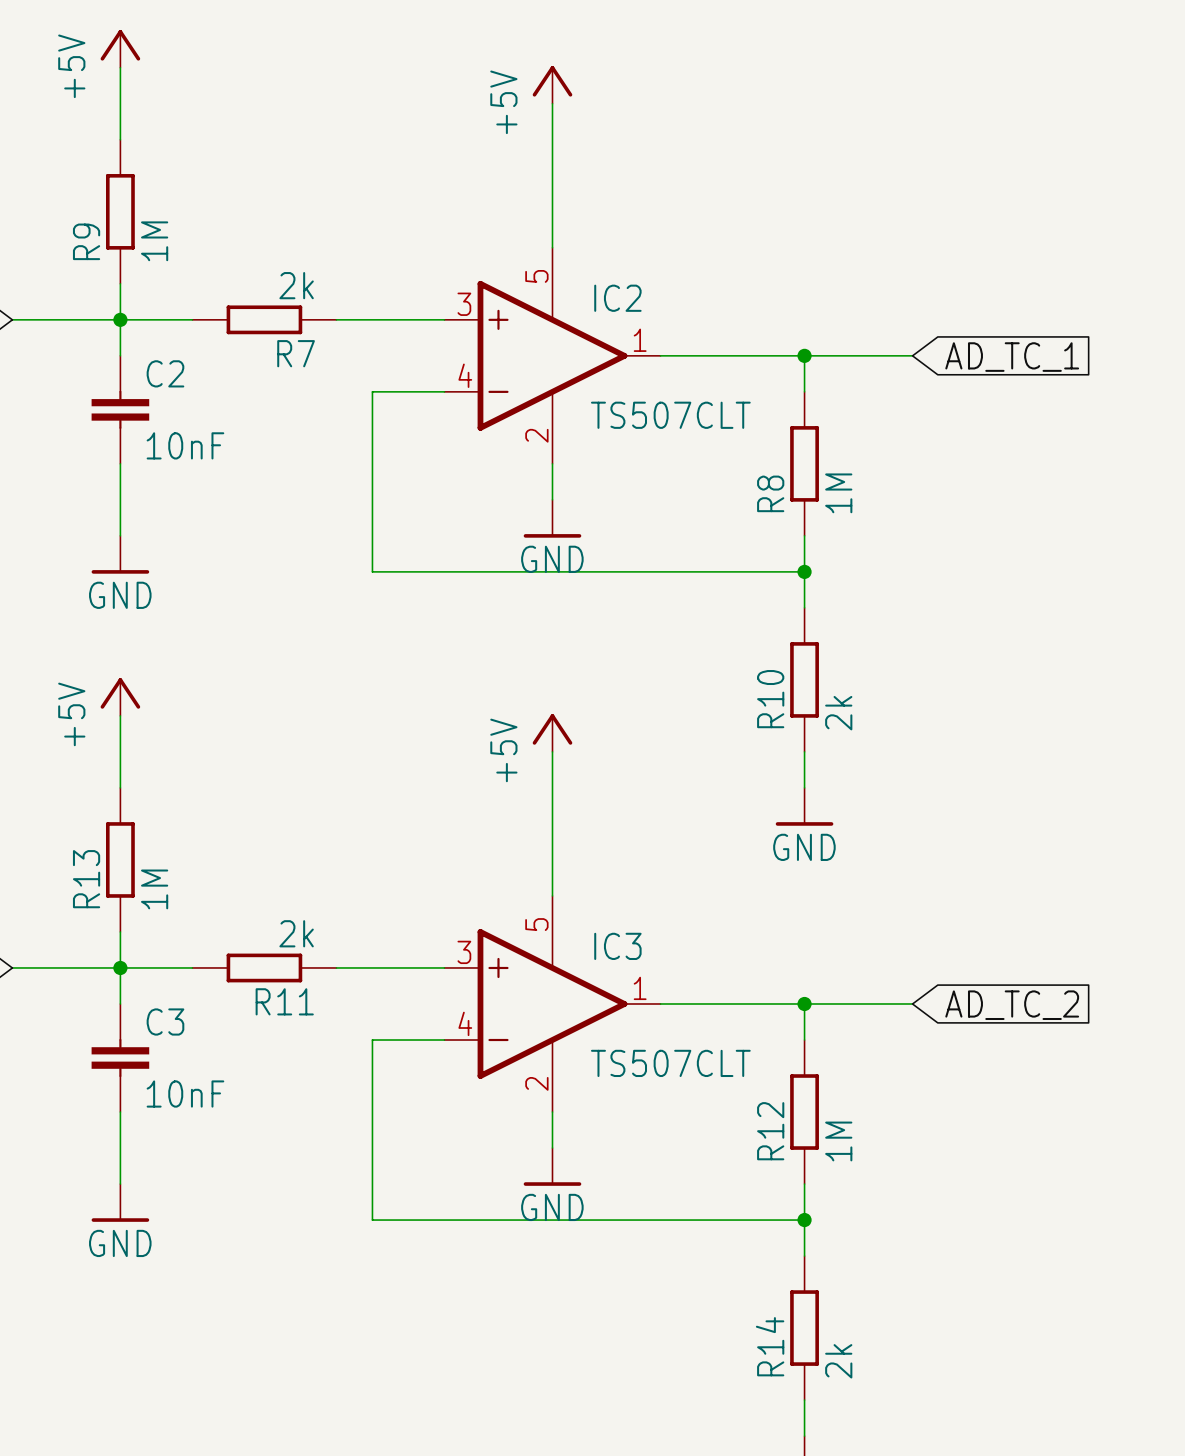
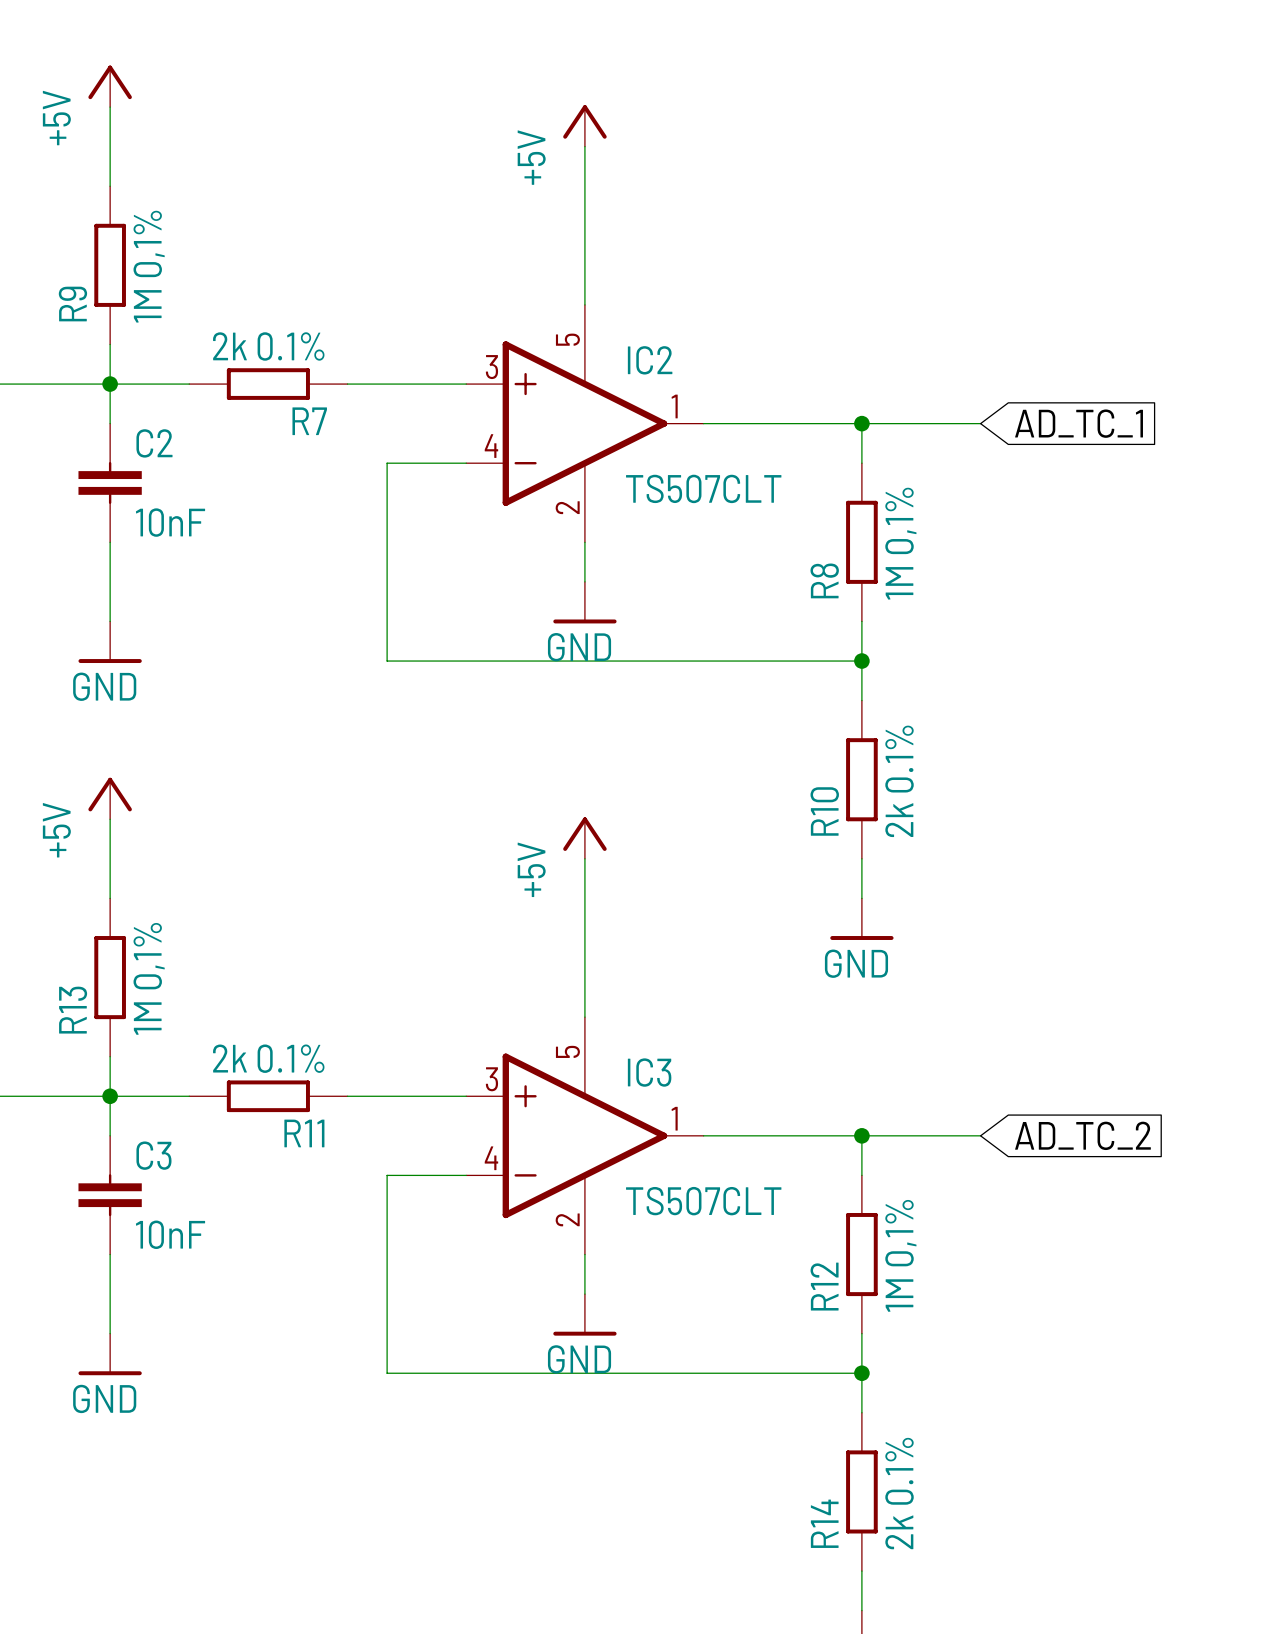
R9 value: 1M (154, 241) -> 1M 0,1% (149, 266)
R7 value: 2k (296, 285) -> 2k 0.1% (268, 346)
R8 value: 1M (838, 493) -> 1M 0,1% (900, 543)
R10 value: 2k (838, 713) -> 2k 0.1% (899, 781)
R13 value: 1M (154, 889) -> 1M 0,1% (149, 978)
R11 value: 2k (296, 933) -> 2k 0.1% (268, 1058)
R12 value: 1M (838, 1141) -> 1M 0,1% (900, 1255)
R14 value: 2k (838, 1361) -> 2k 0.1% (899, 1493)

